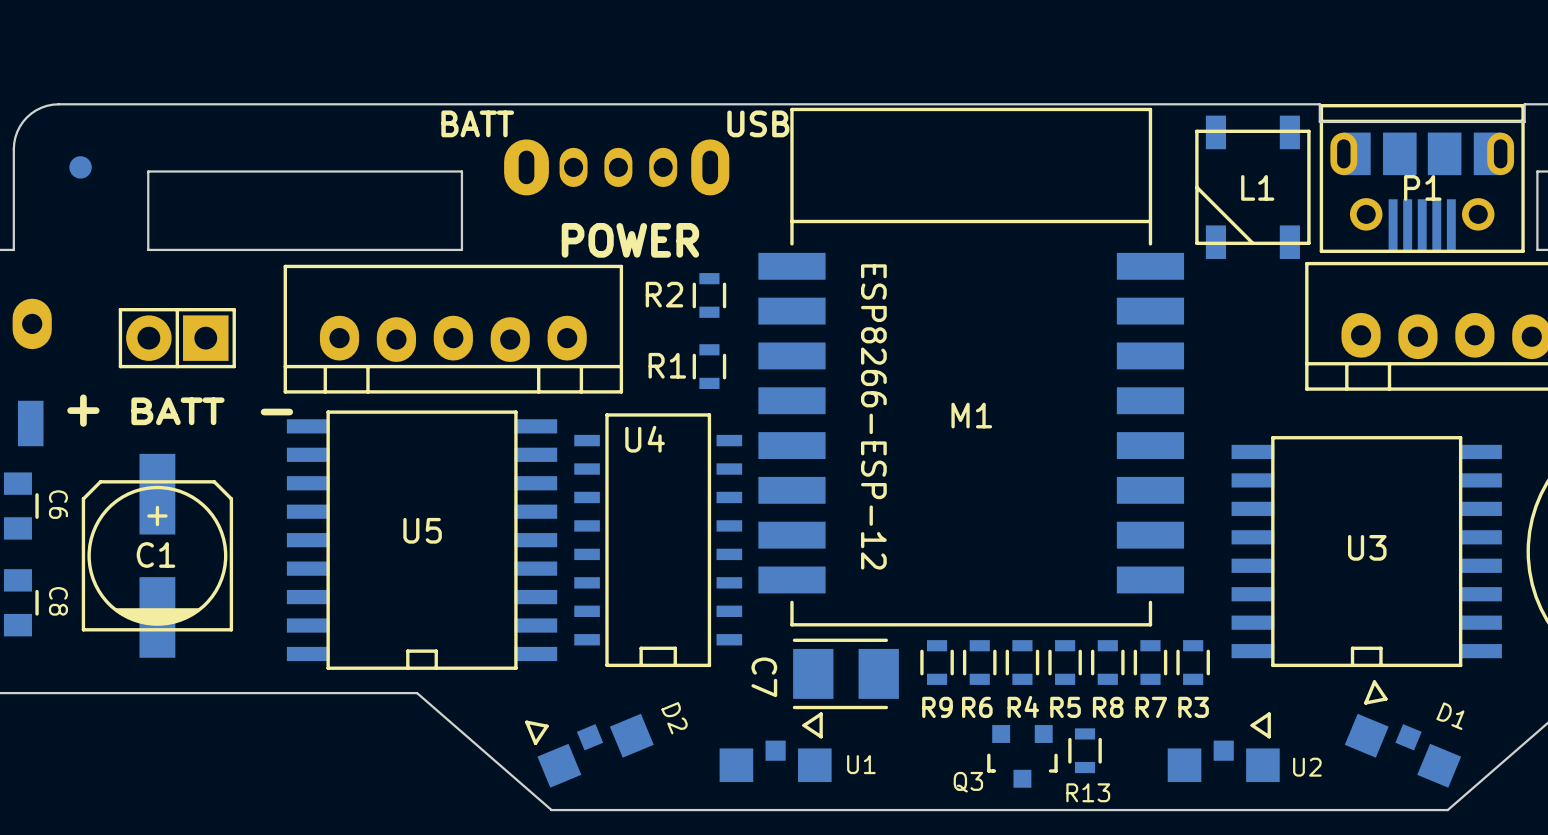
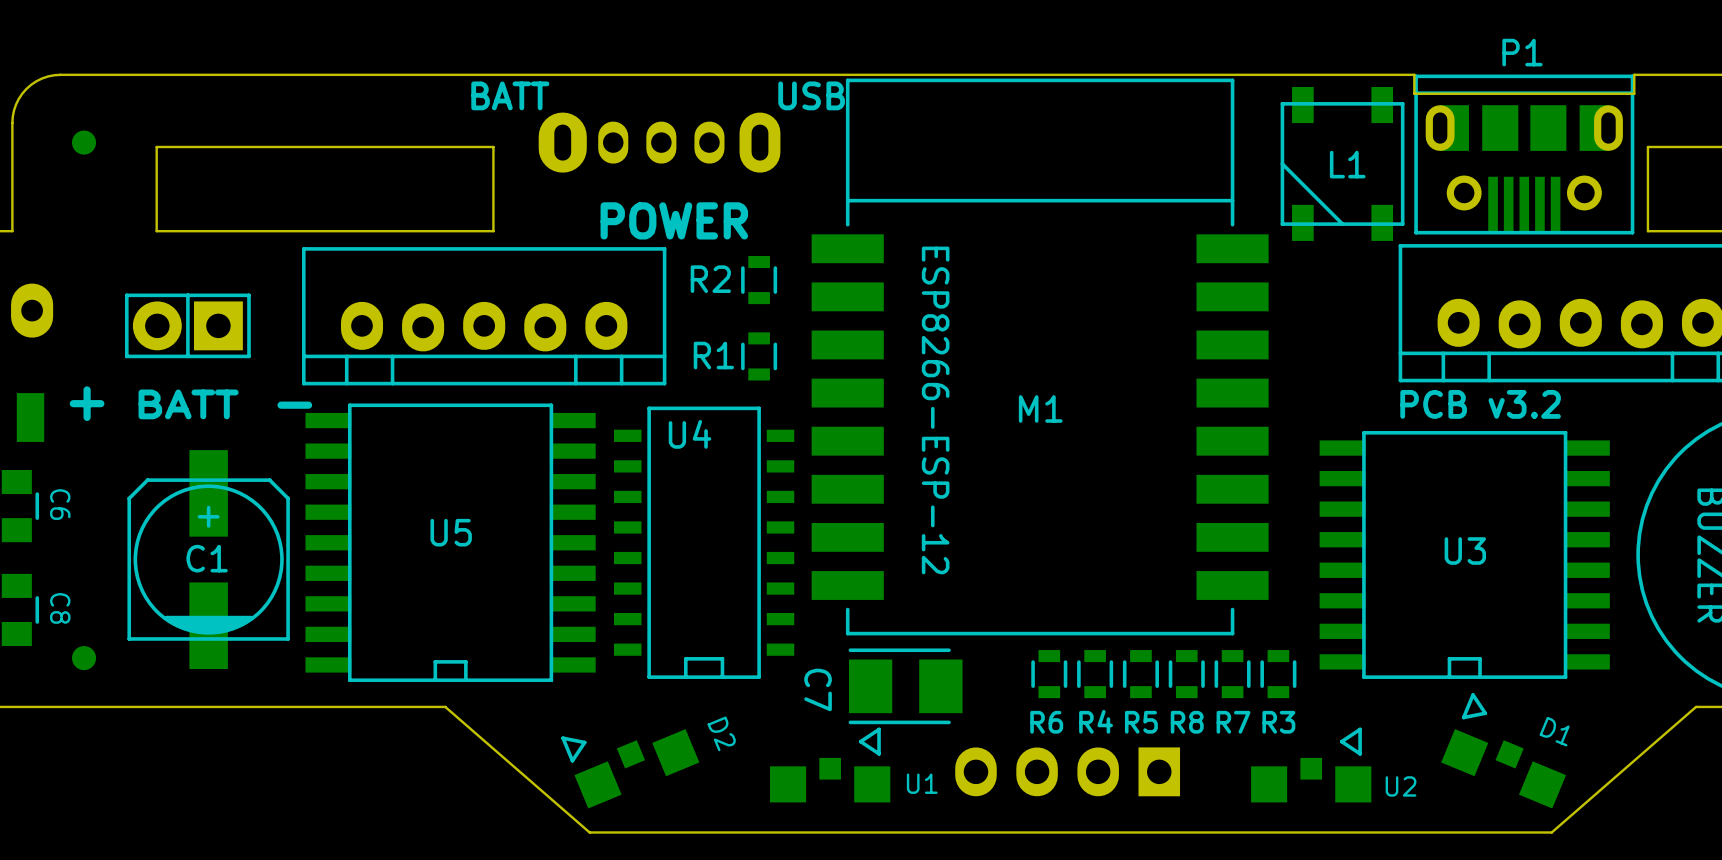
P1 name position: P1 (1422, 187) -> P1 (1522, 52)
text: none -> PCB v3.2 (1480, 404)
C1 position: (157, 555) -> (208, 559)
part: none -> (84, 658)
R9: (937, 662) -> none
R13: (1085, 750) -> none
part: none -> (1067, 771)
Q3: (1022, 756) -> none

